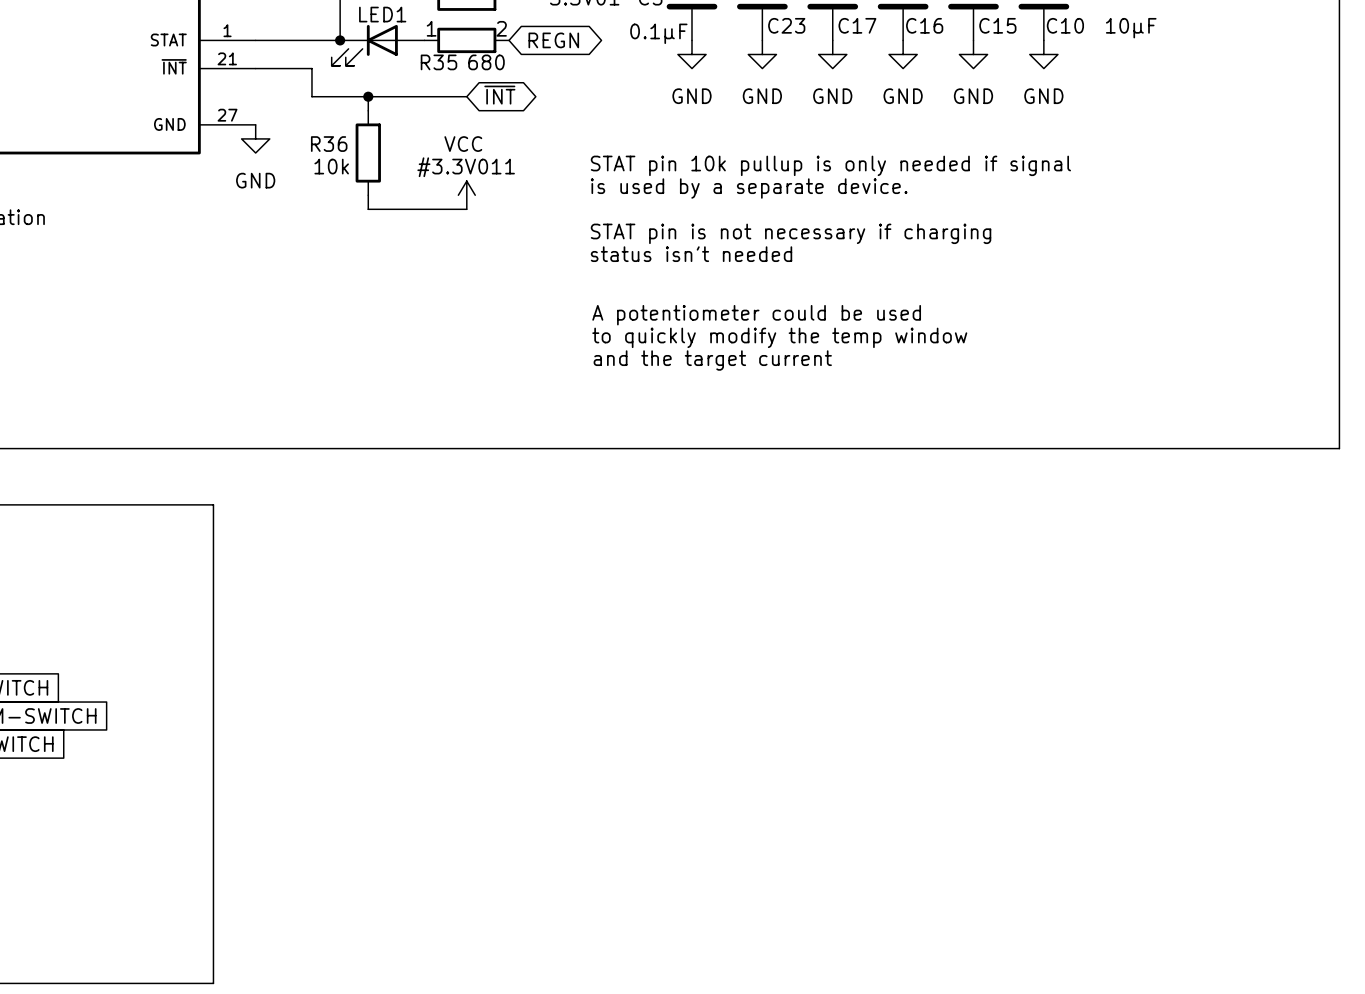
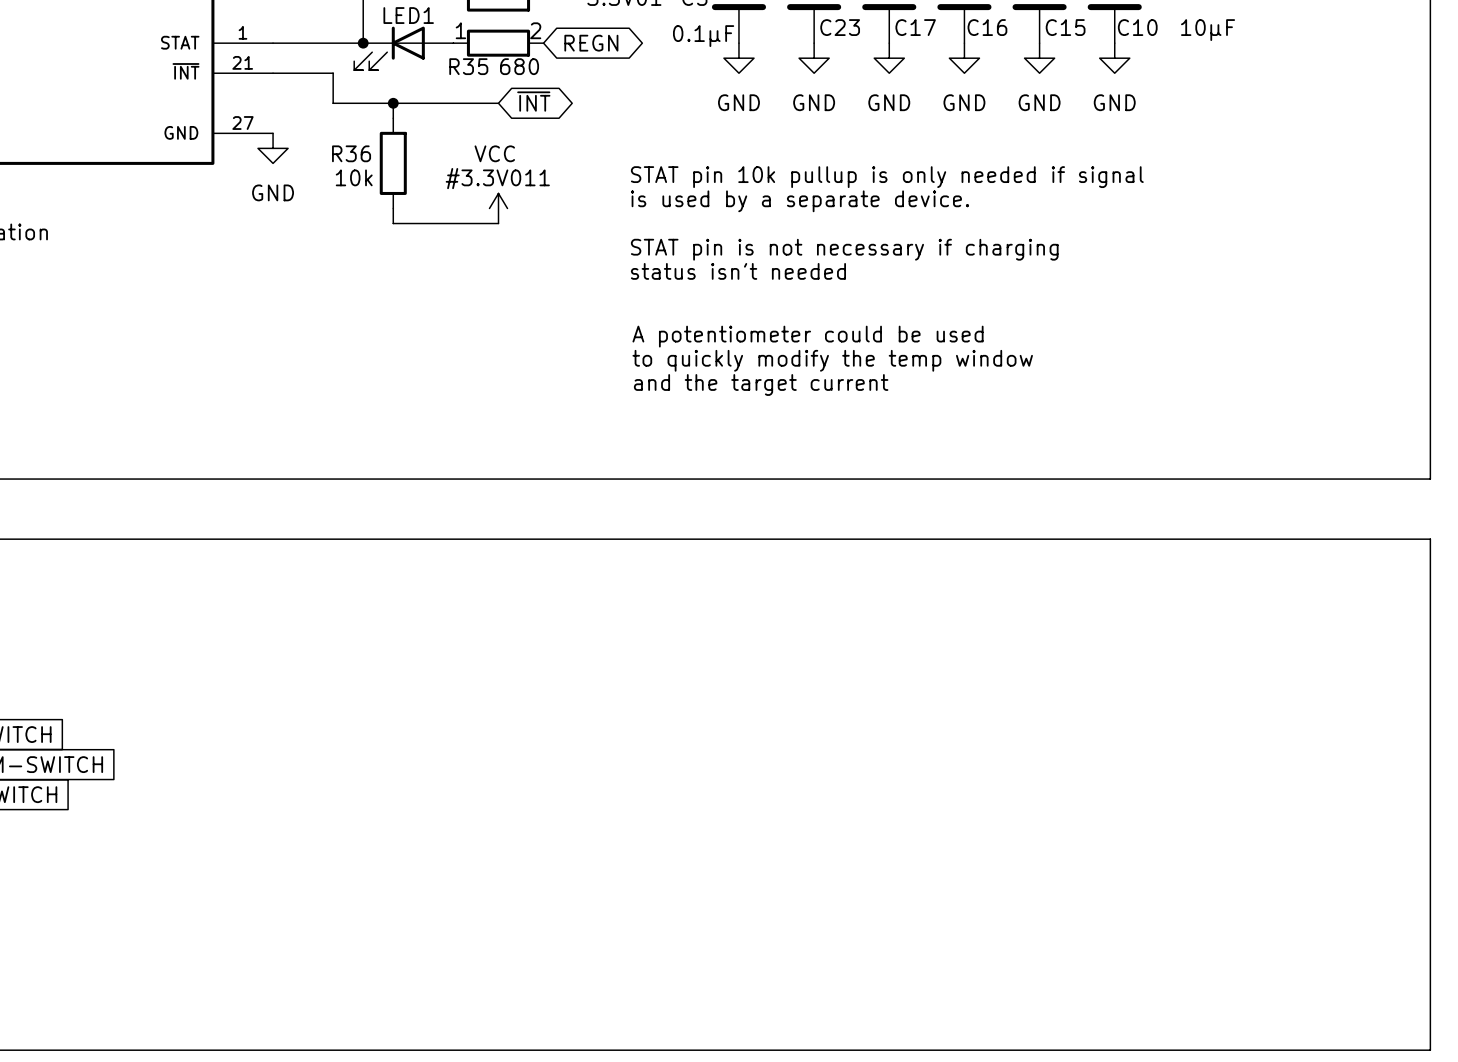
line: (213, 504) (213, 983) -> (227, 539) (1430, 539) (1430, 1050) (227, 1050)

